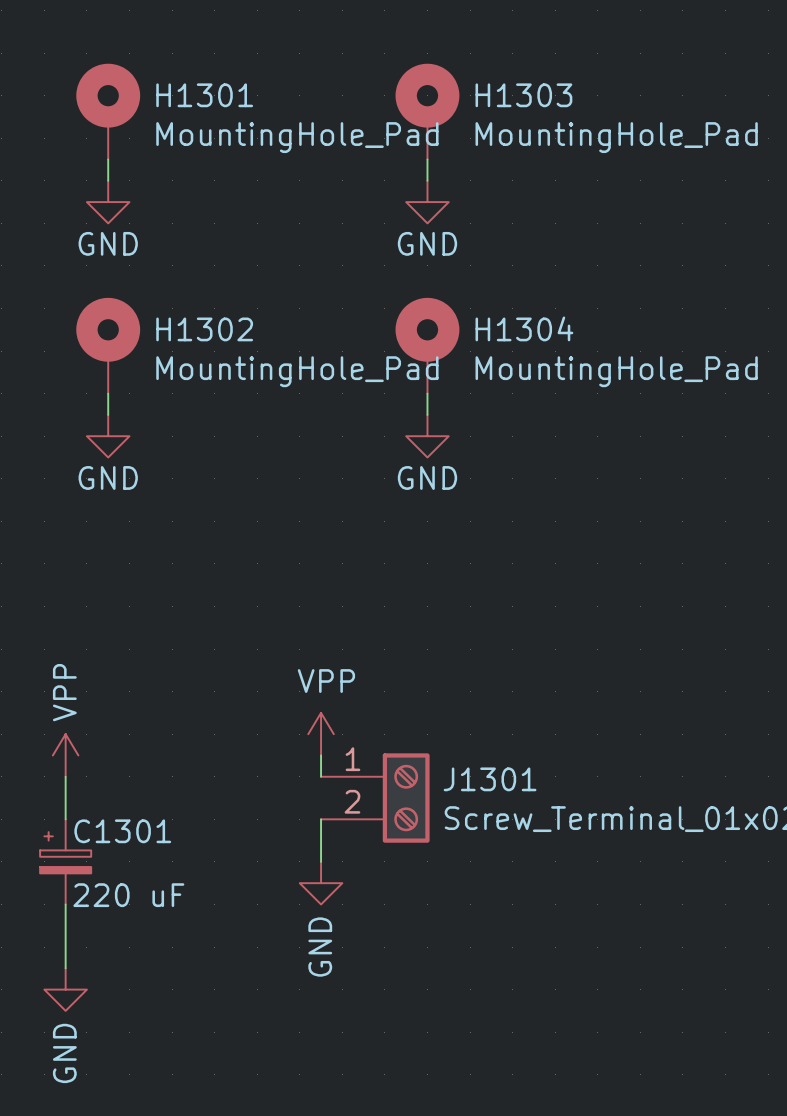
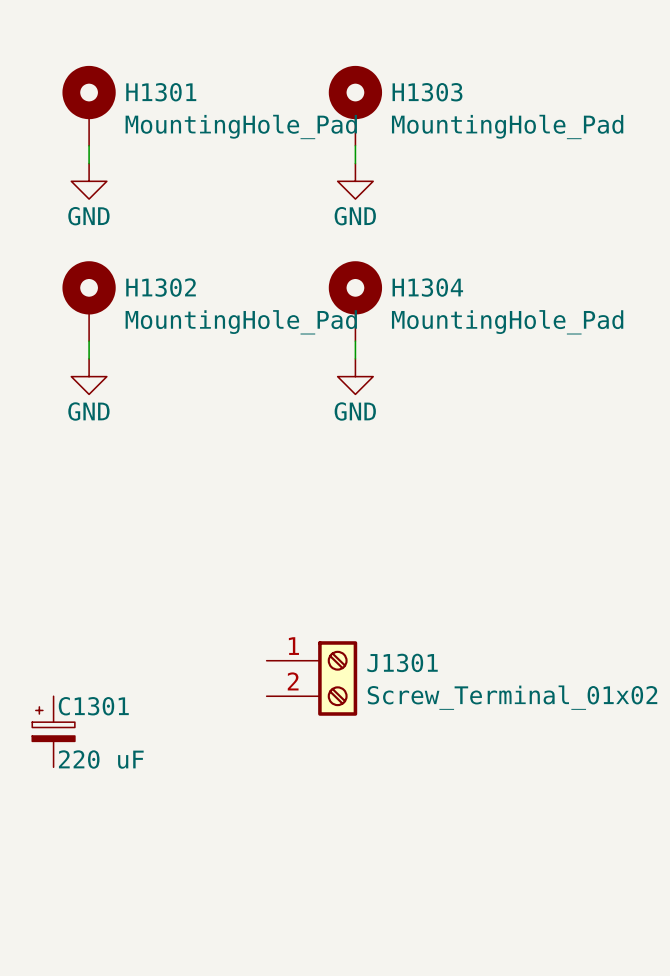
power symbol: VPP (321, 734) -> none
power symbol: VPP (65, 755) -> none
wire: (321, 755) (321, 776) -> none
wire: (65, 776) (65, 819) -> none
wire: (321, 819) (321, 861) -> none
power symbol: GND (321, 883) -> none
wire: (65, 904) (65, 968) -> none
power symbol: GND (65, 989) -> none

